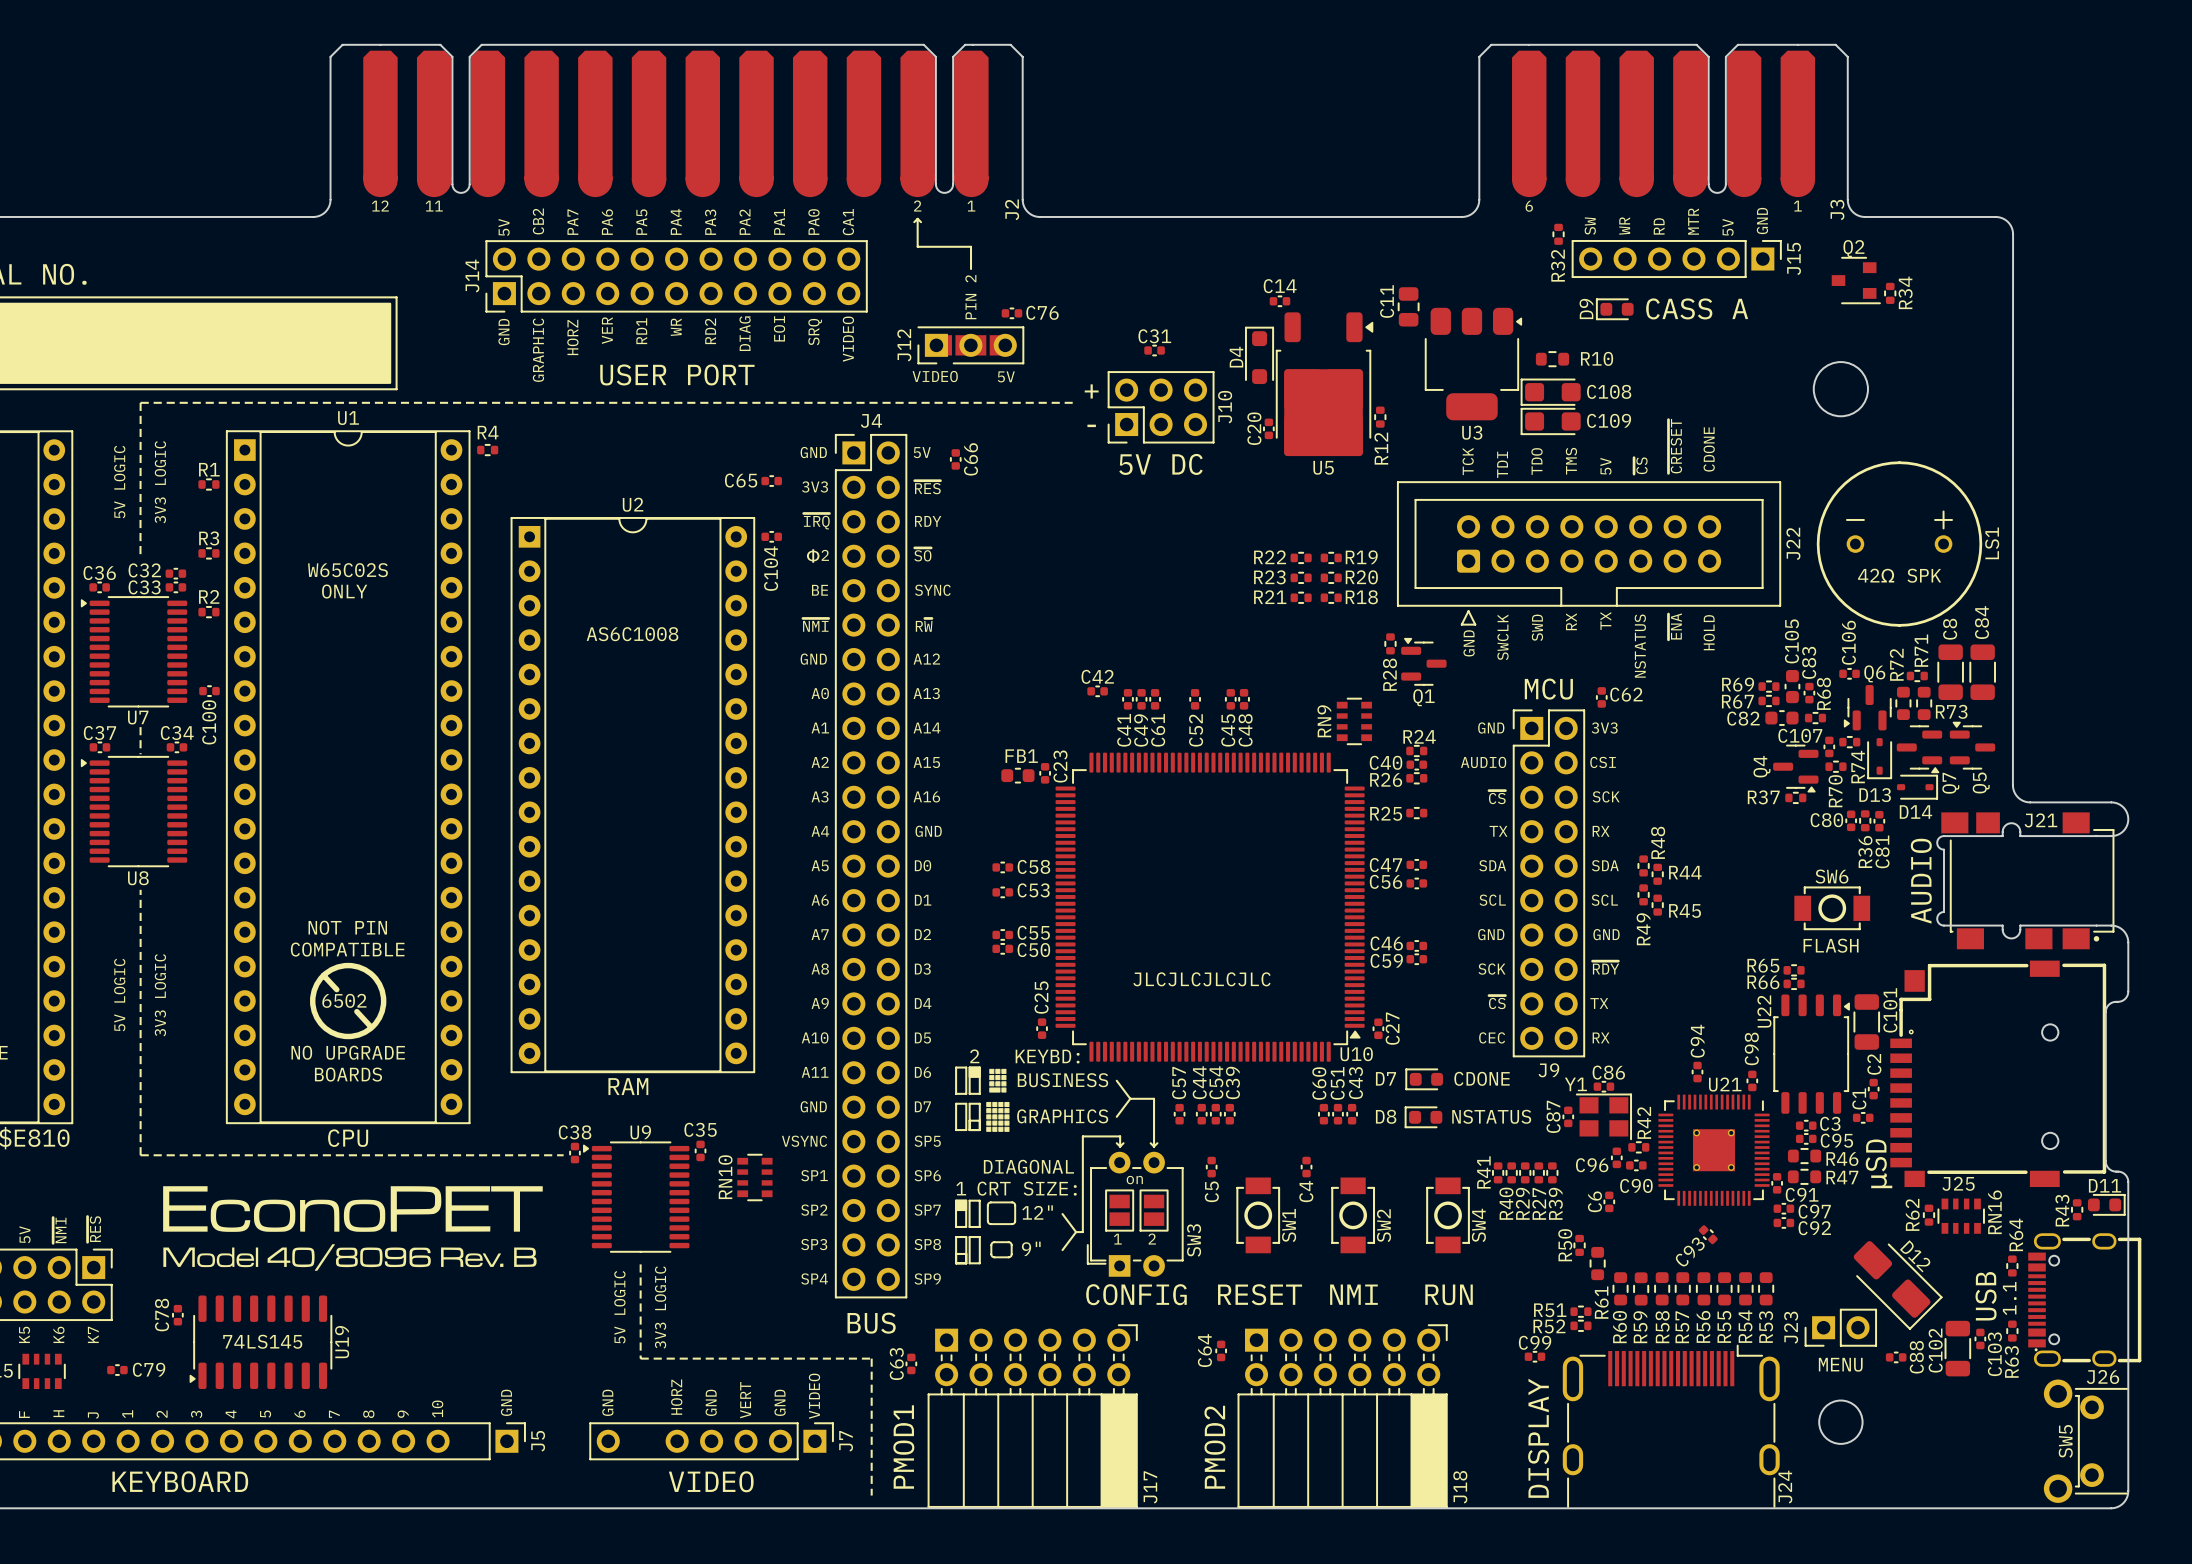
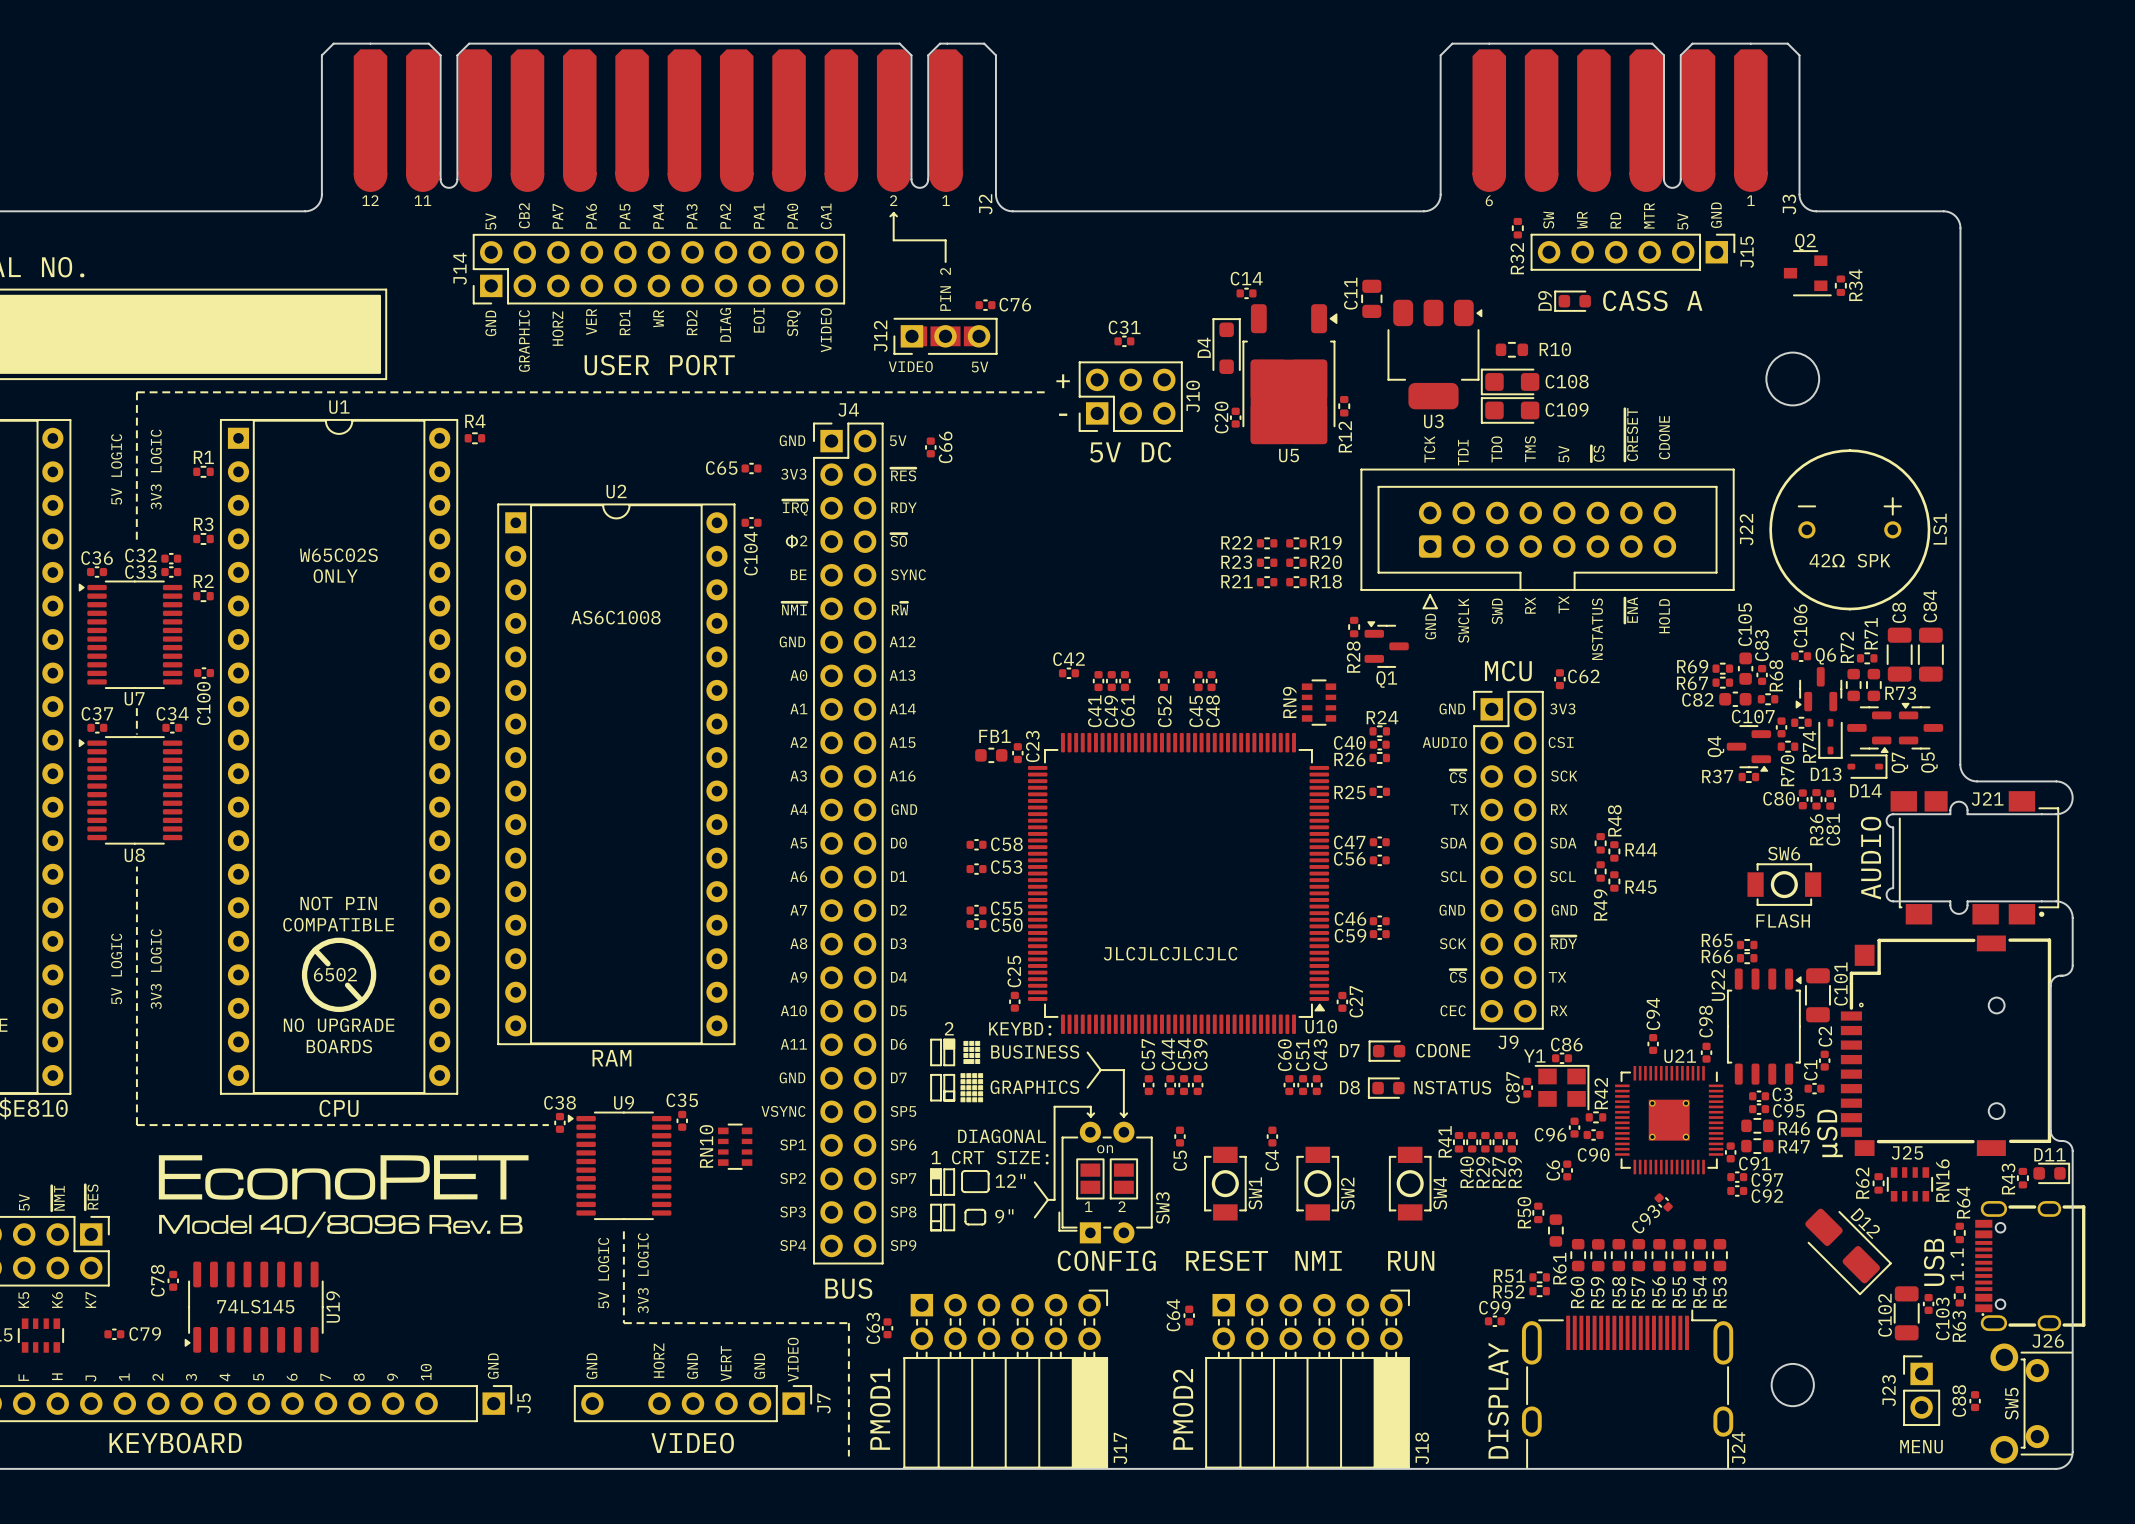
J23 rotation: 0° (1840, 1327) -> 90° clockwise (1921, 1390)
J23 position: (1840, 1327) -> (1921, 1390)
C88 rotation: 0° (1896, 1357) -> 90° clockwise (1975, 1401)
C88 position: (1896, 1357) -> (1975, 1401)
text position: MENU (1840, 1364) -> MENU (1921, 1446)

